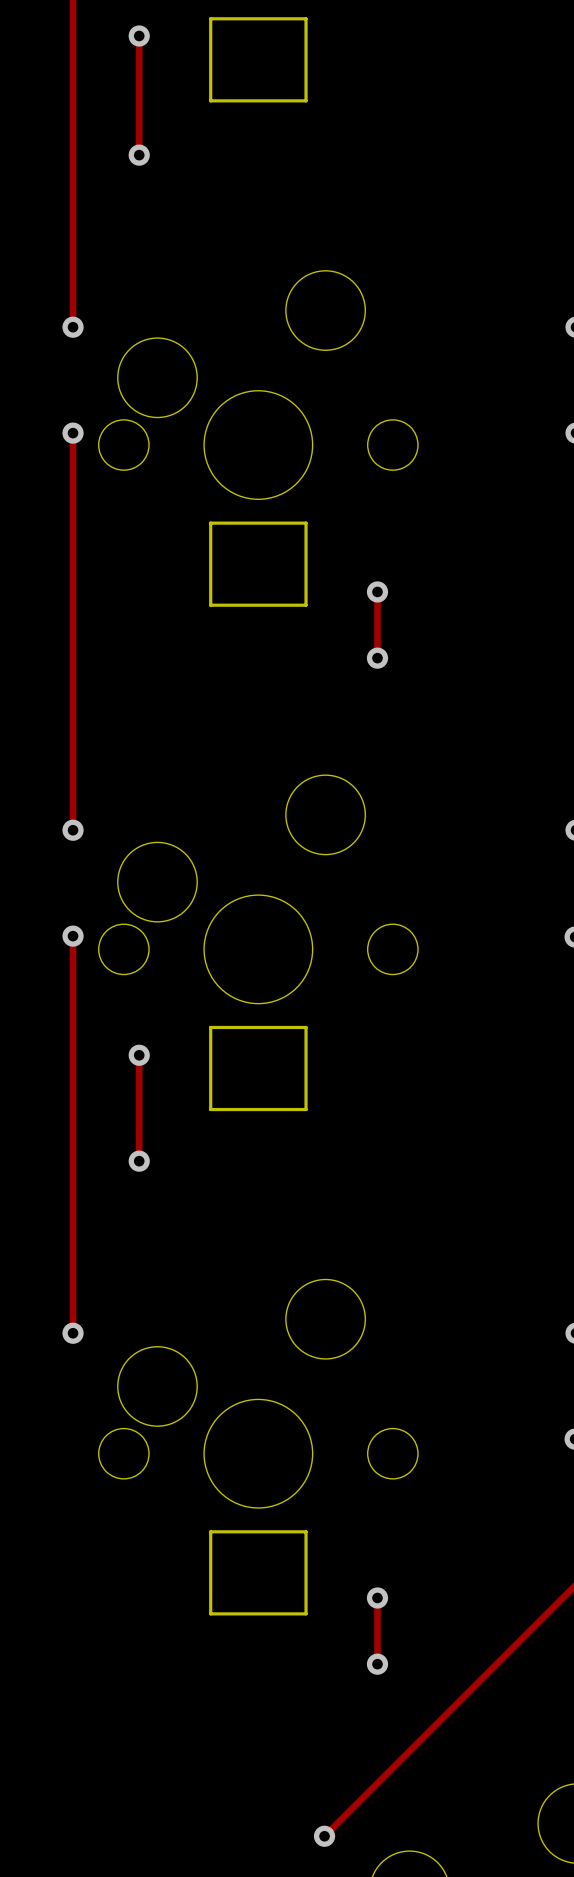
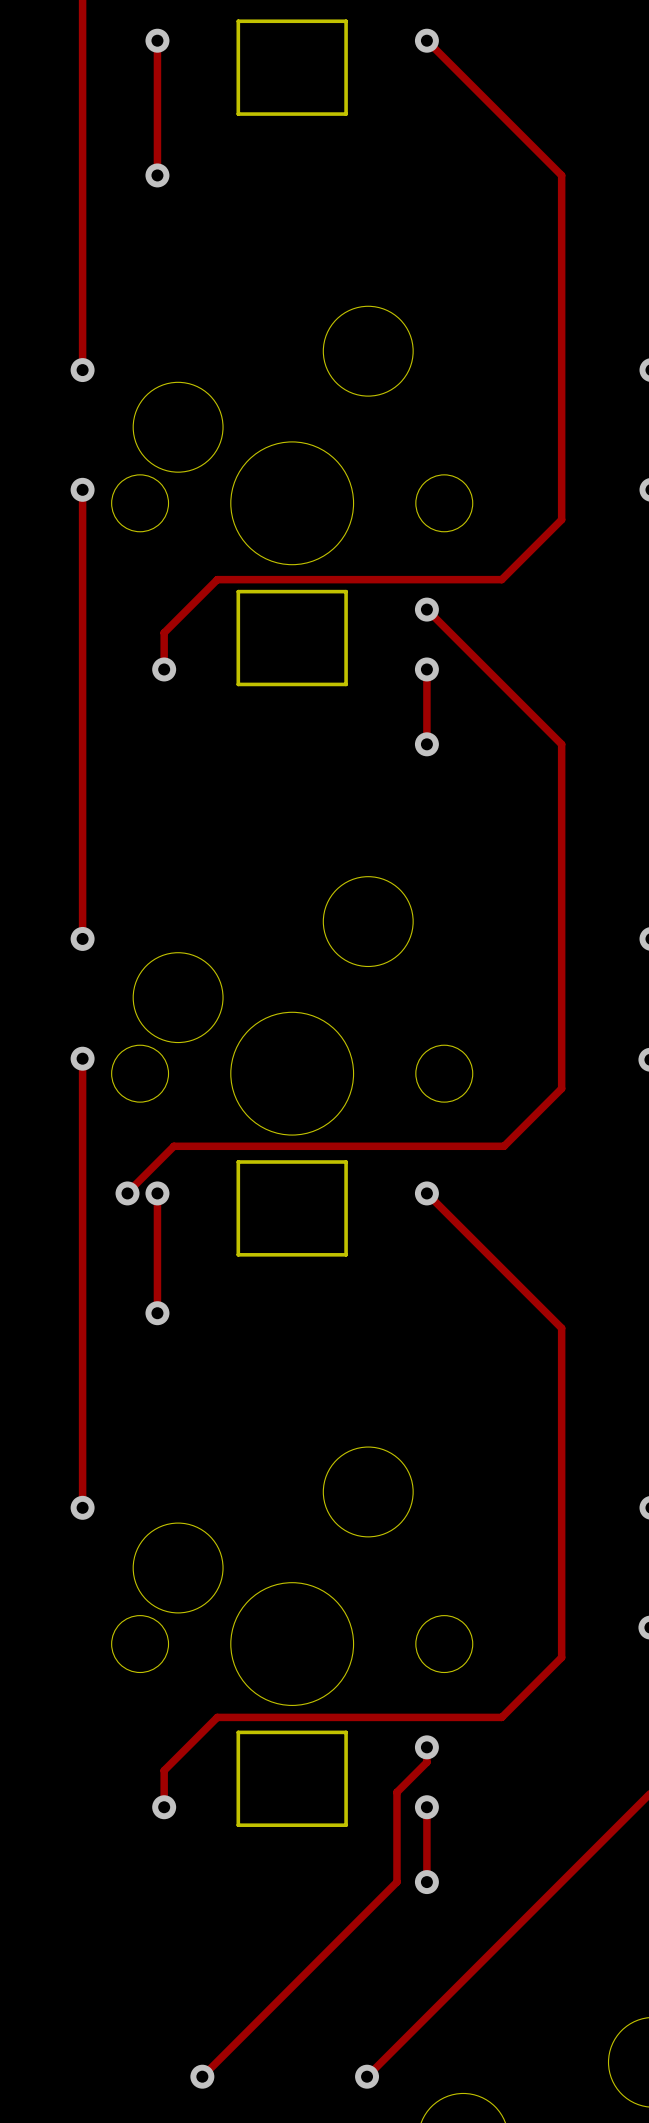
track: none -> (426, 40) (561, 175) (561, 519) (501, 579) (217, 579) (164, 632) (164, 669)
via: none -> (426, 40)
track: none -> (426, 609) (561, 744) (561, 1088) (504, 1146) (173, 1146) (127, 1193)
via: none -> (426, 609)
via: none -> (164, 669)
via: none -> (127, 1193)
track: none -> (426, 1193) (561, 1328) (561, 1657) (501, 1717) (217, 1717) (164, 1770) (164, 1807)
via: none -> (426, 1193)
track: none -> (426, 1747) (426, 1762) (396, 1792) (396, 1882) (202, 2076)
via: none -> (426, 1747)
via: none -> (164, 1807)
via: none -> (202, 2076)

